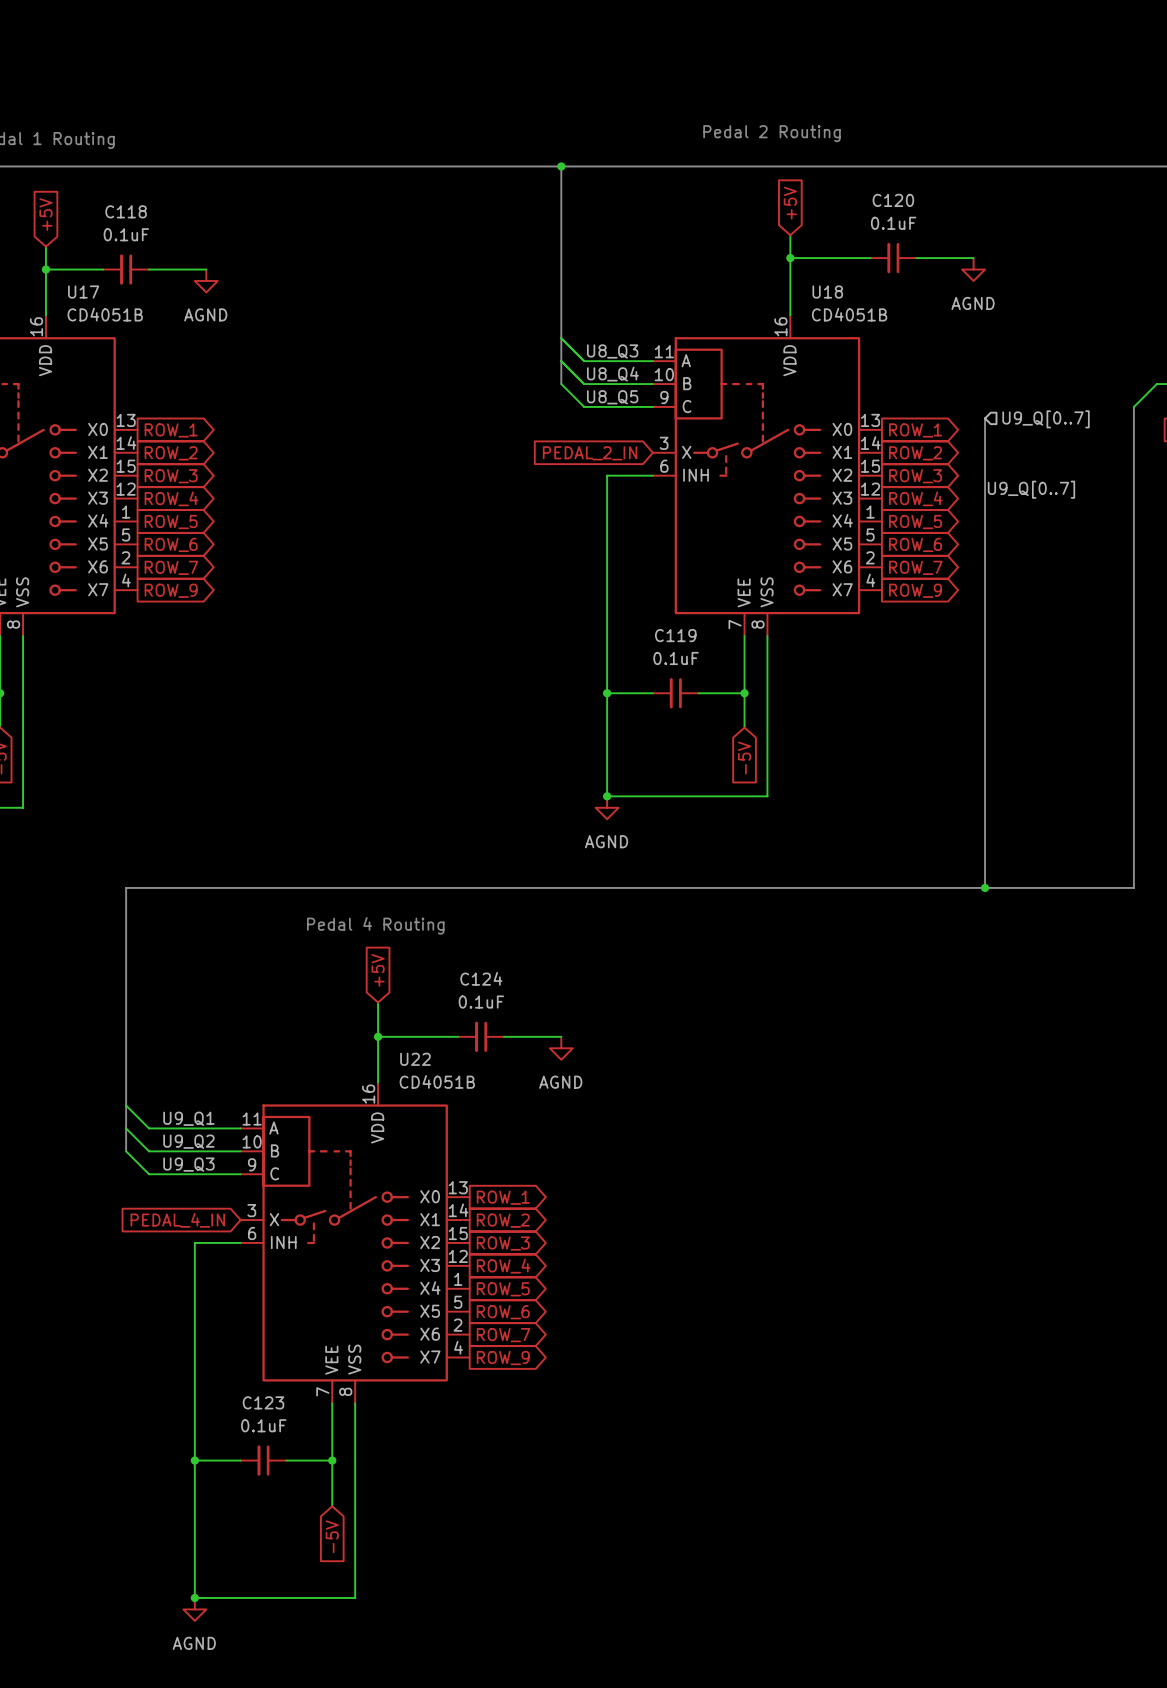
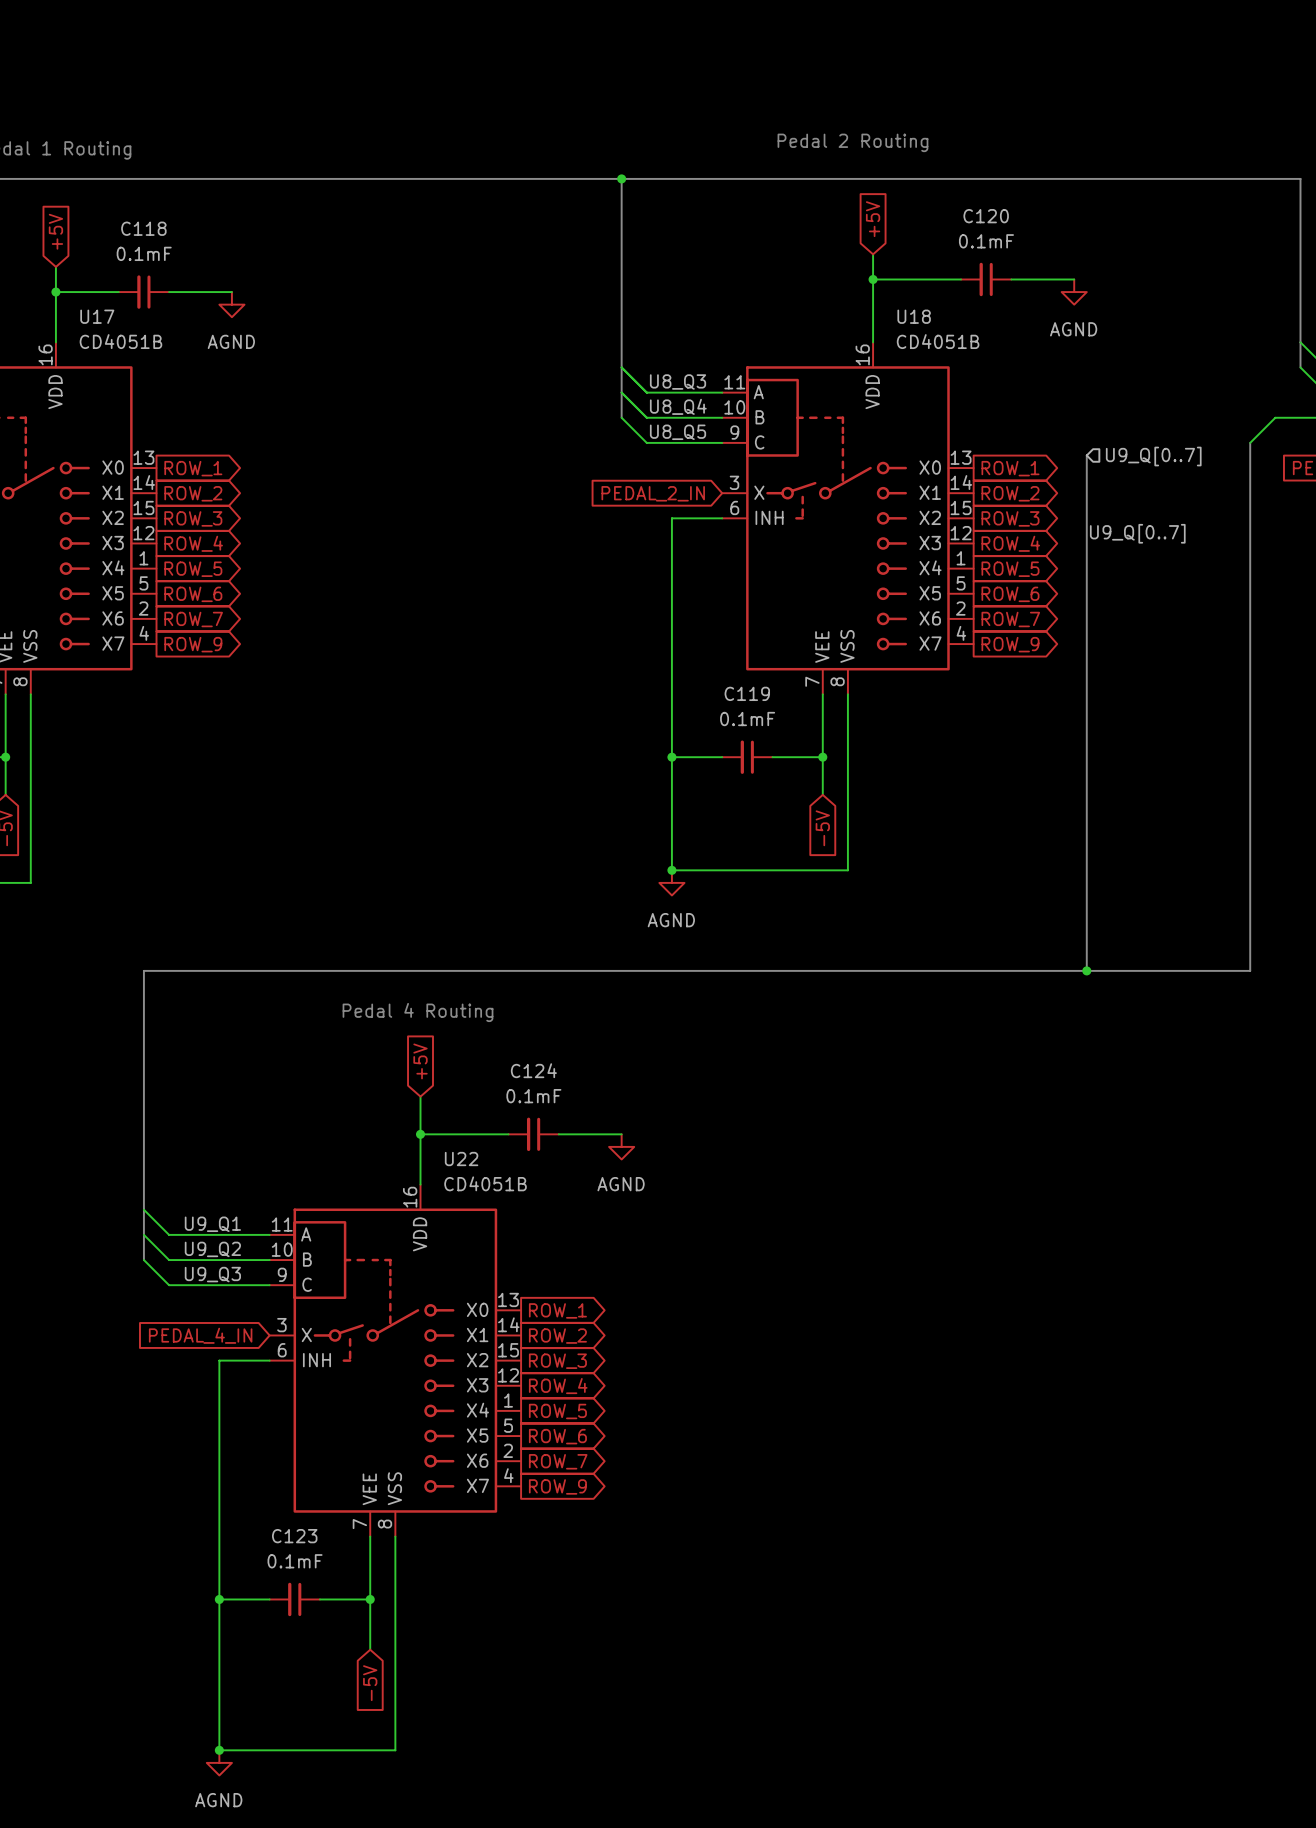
C120 value: 0.1uF (893, 223) -> 0.1mF (986, 241)
C118 value: 0.1uF (126, 234) -> 0.1mF (144, 253)
C119 value: 0.1uF (676, 658) -> 0.1mF (747, 719)
C124 value: 0.1uF (481, 1002) -> 0.1mF (533, 1096)
C123 value: 0.1uF (263, 1425) -> 0.1mF (295, 1561)

